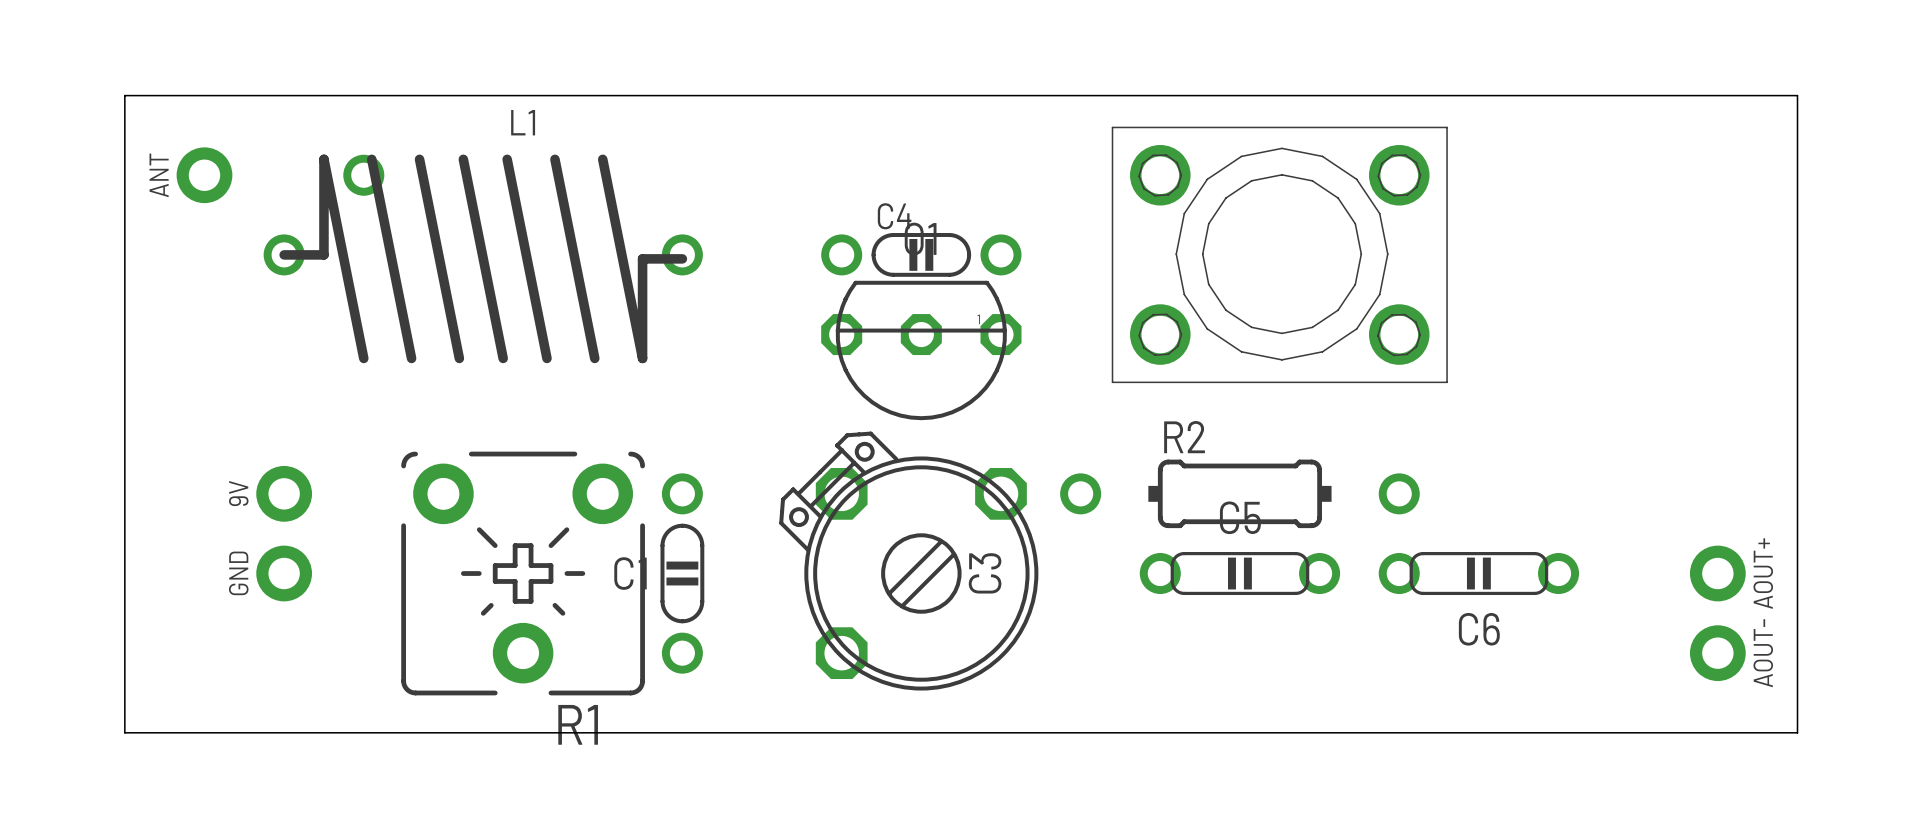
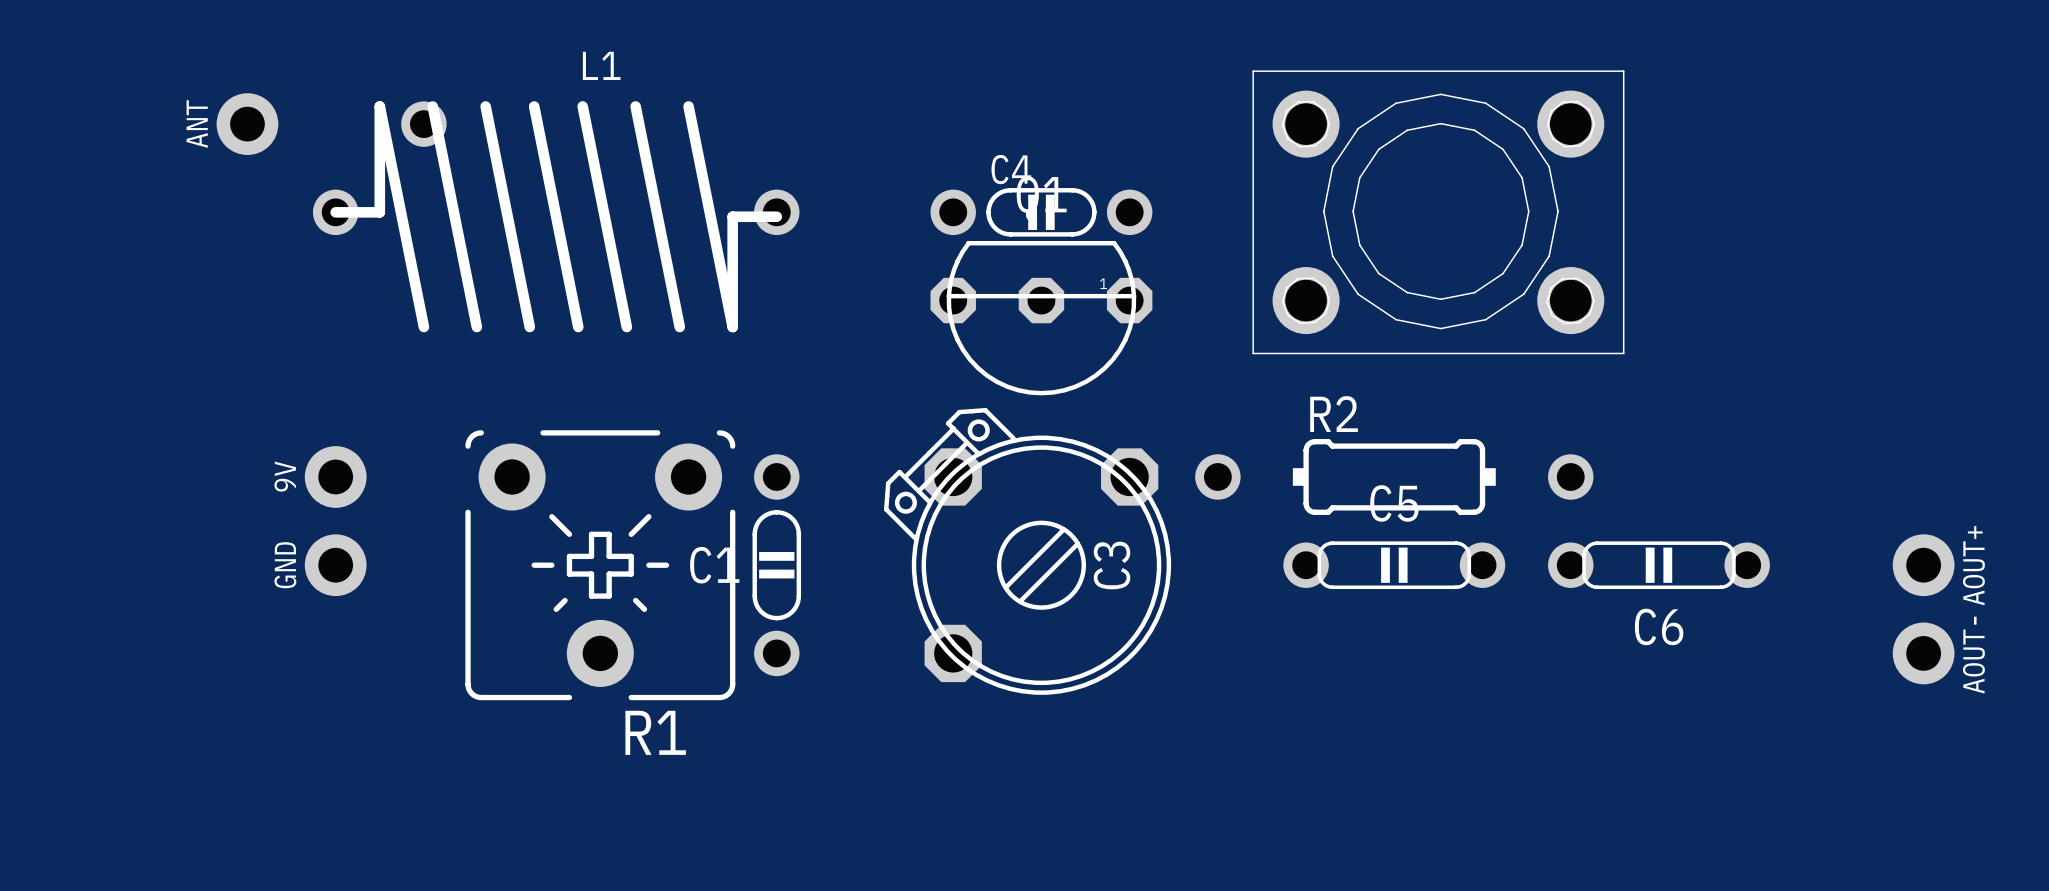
board edge: (124, 95) (1797, 95) (1797, 732) (124, 732) (124, 95) -> none

